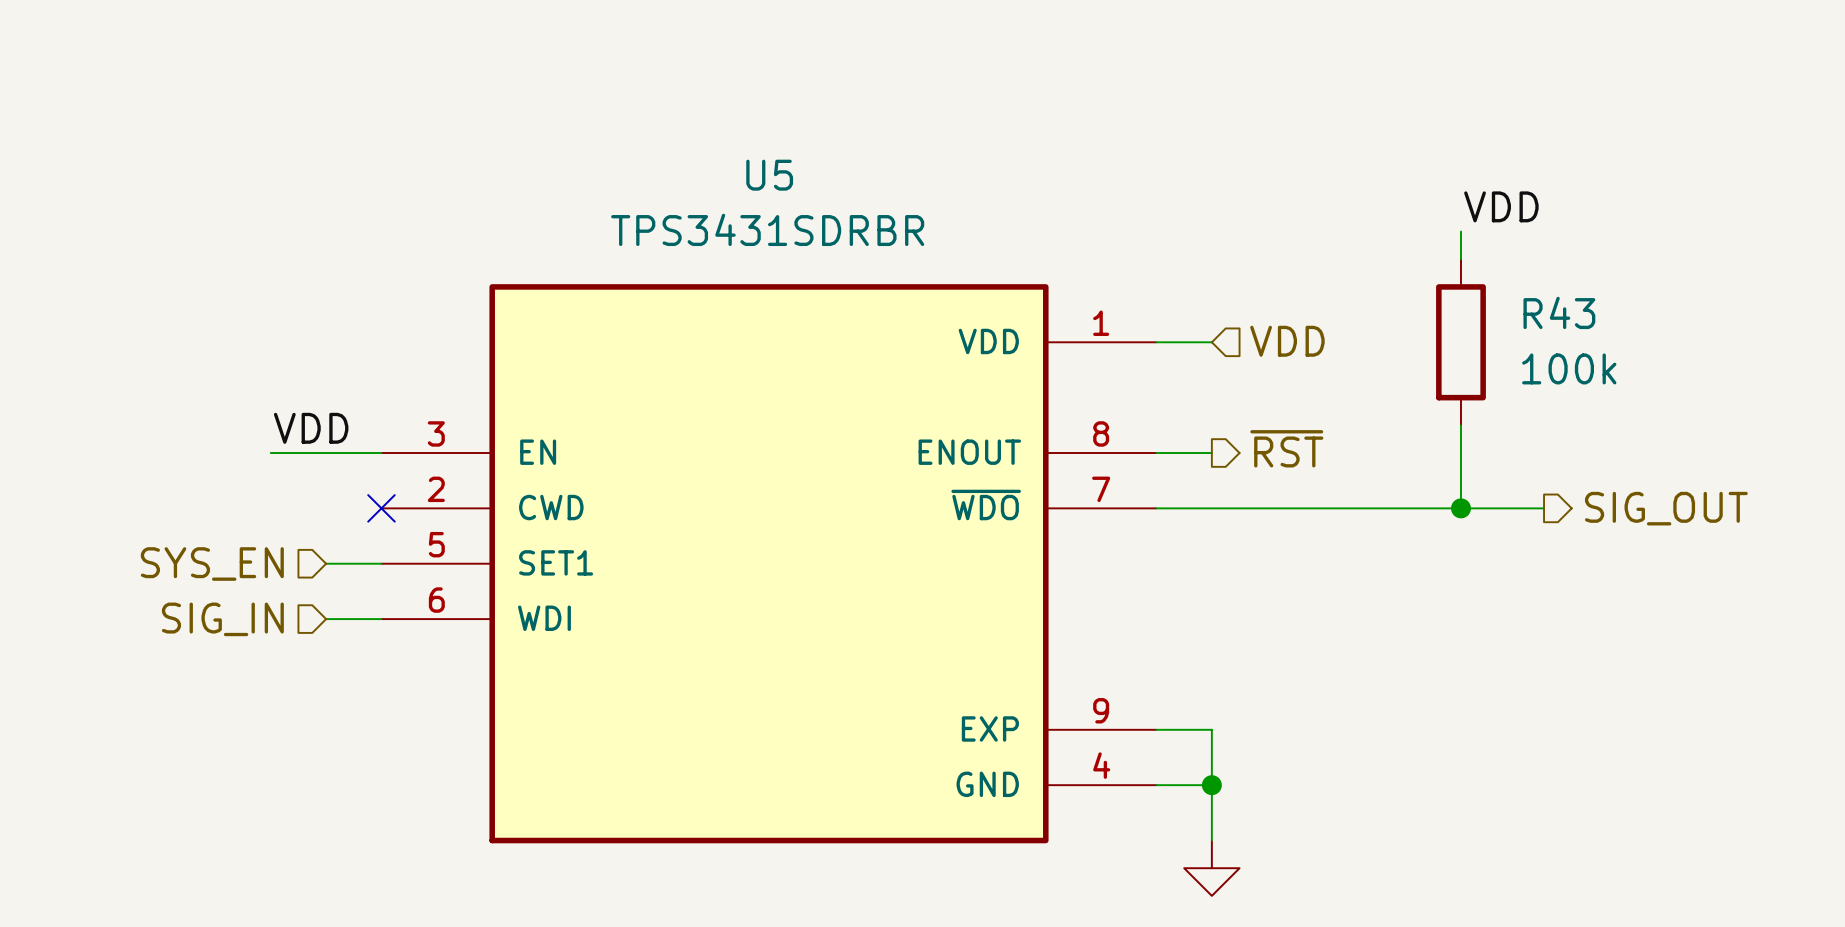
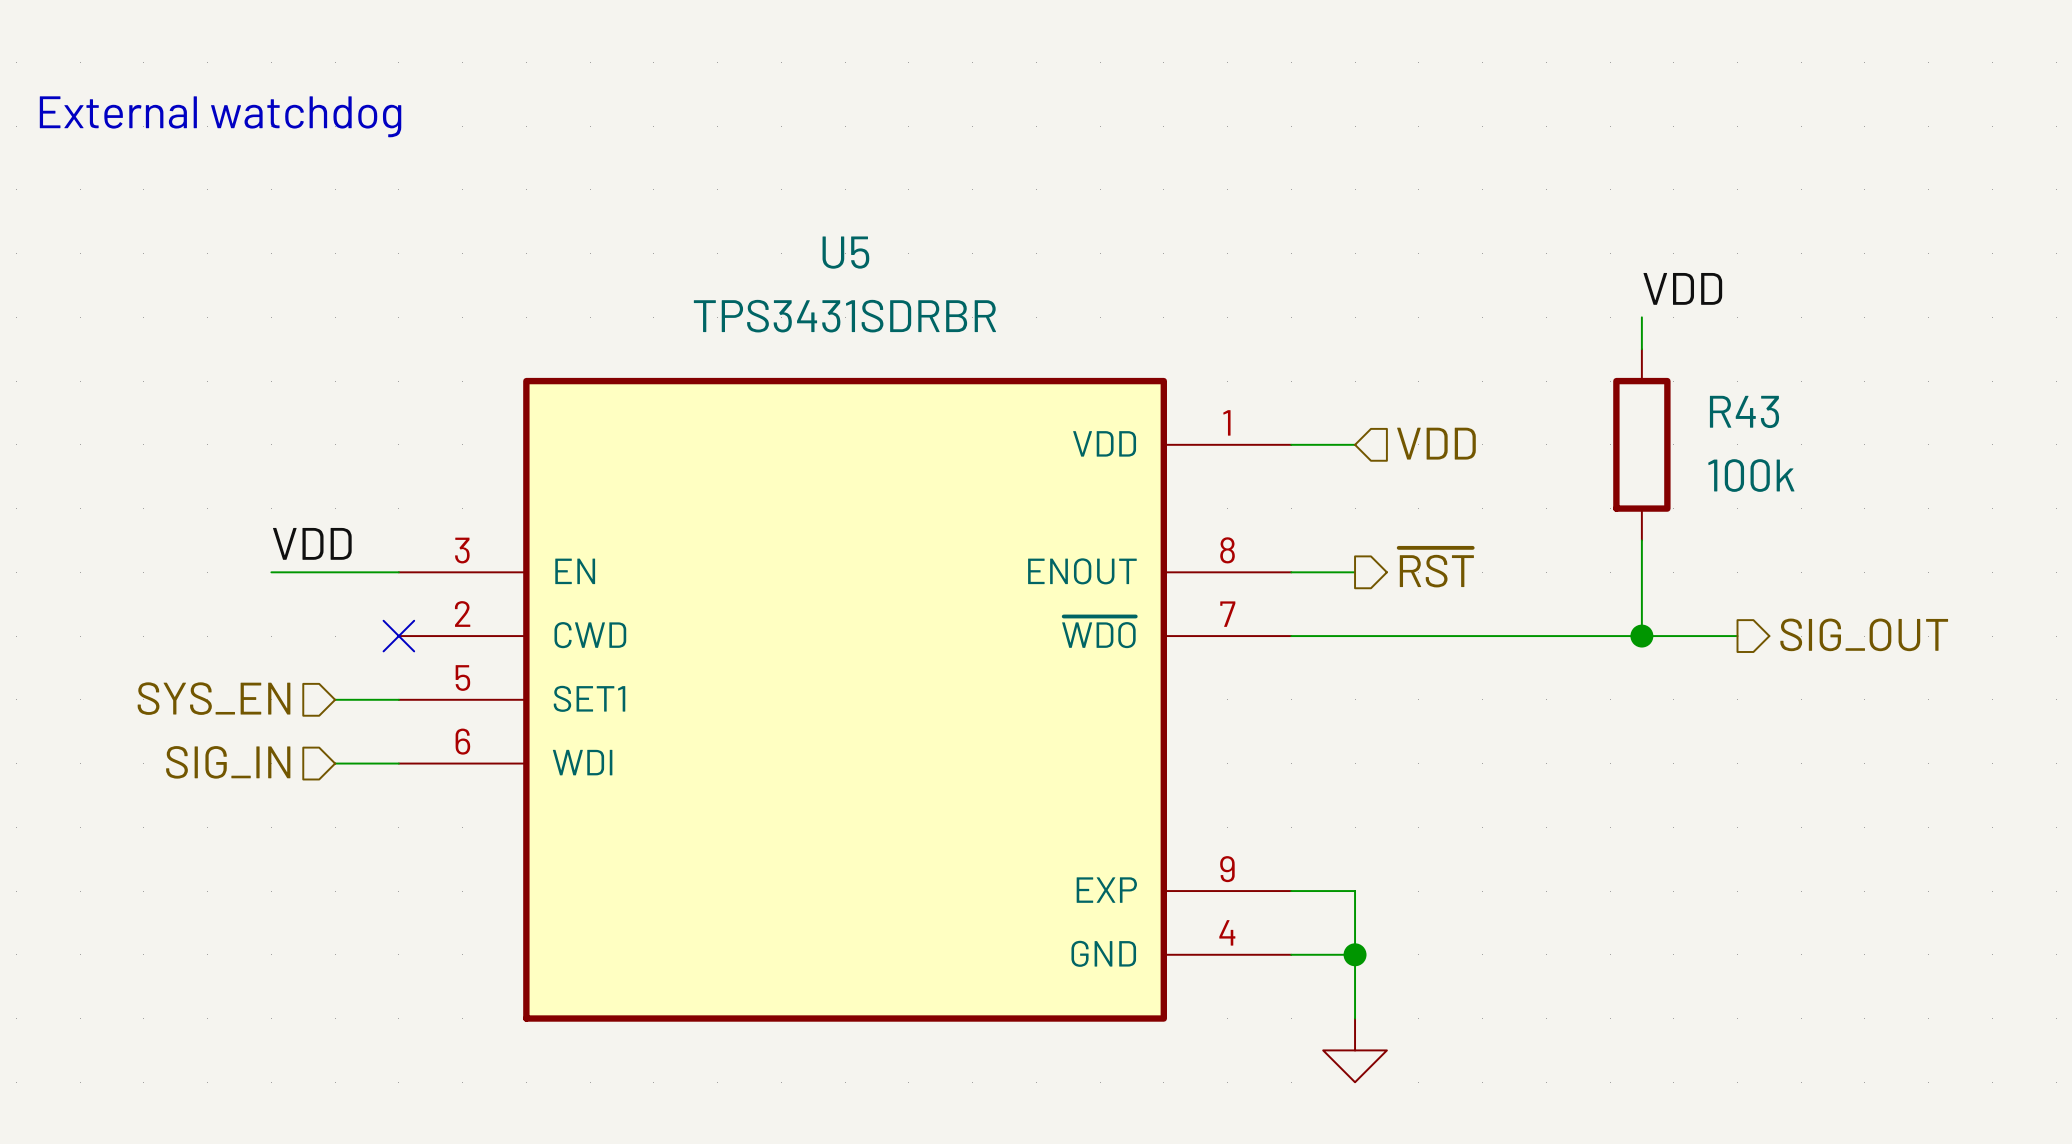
text: none -> External watchdog (220, 116)

